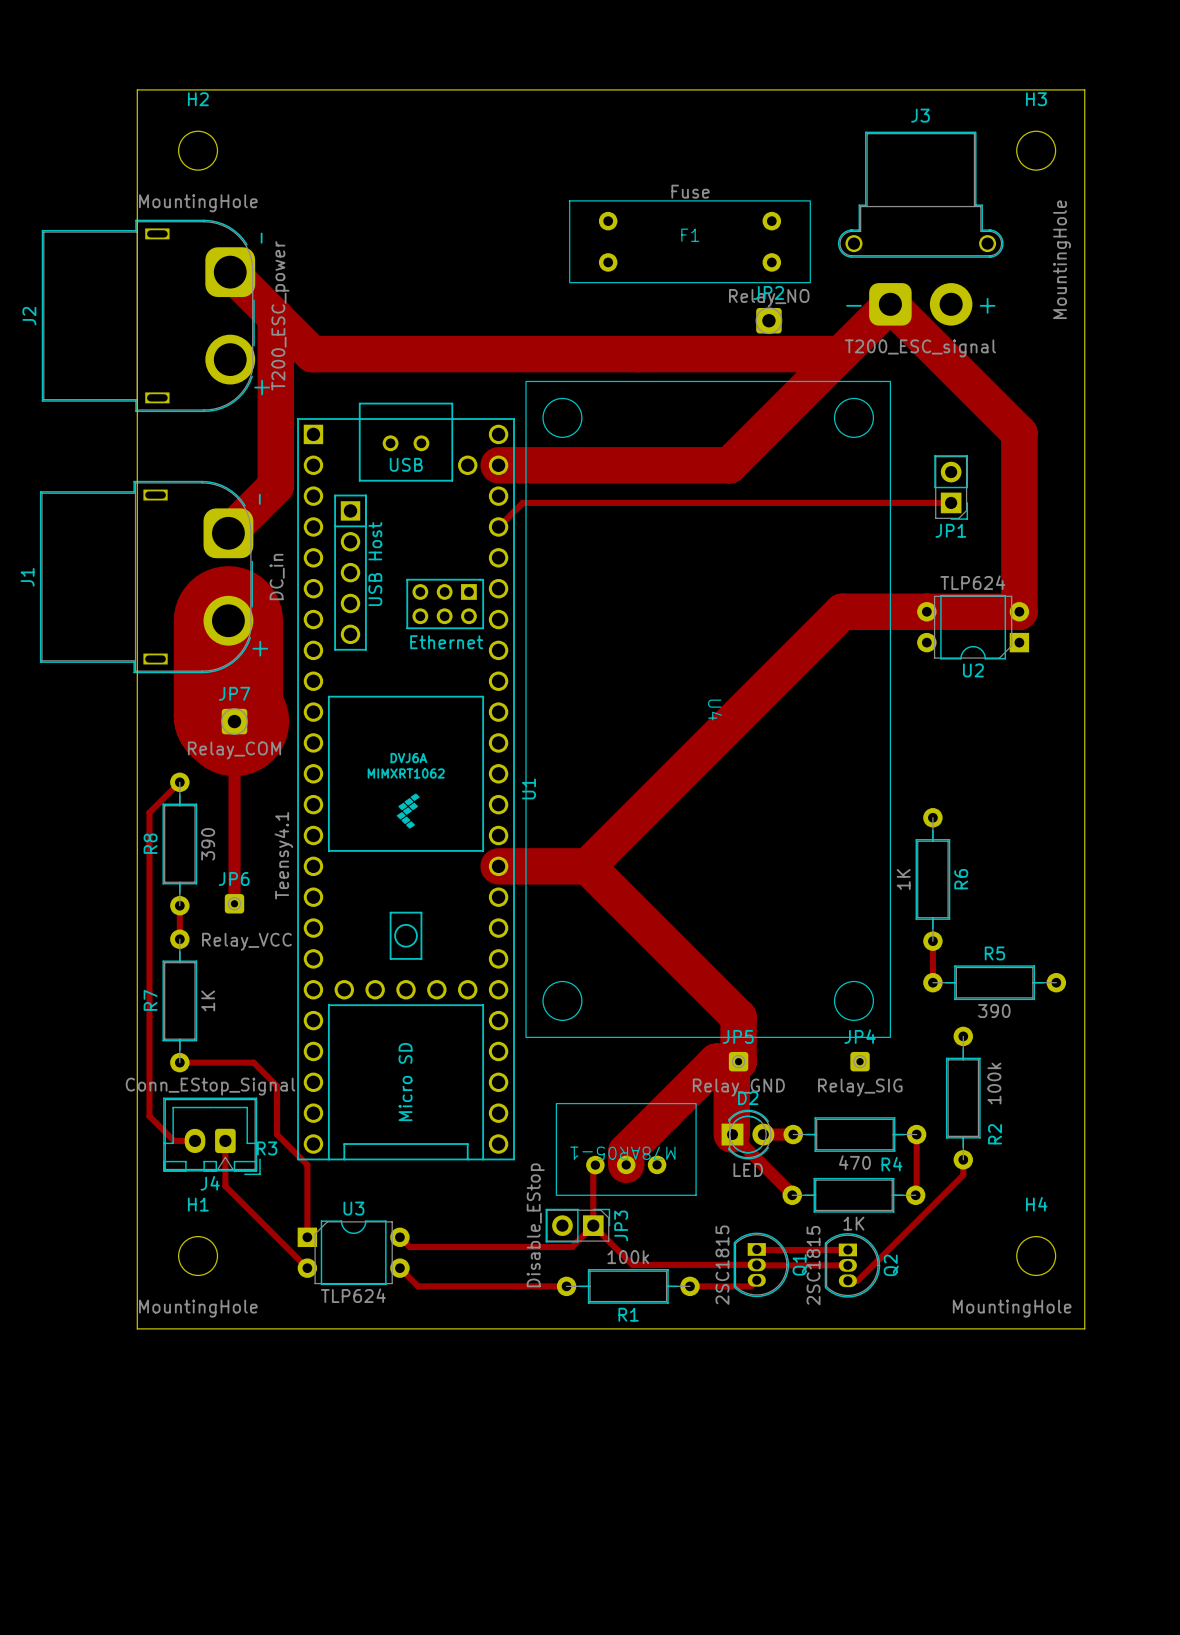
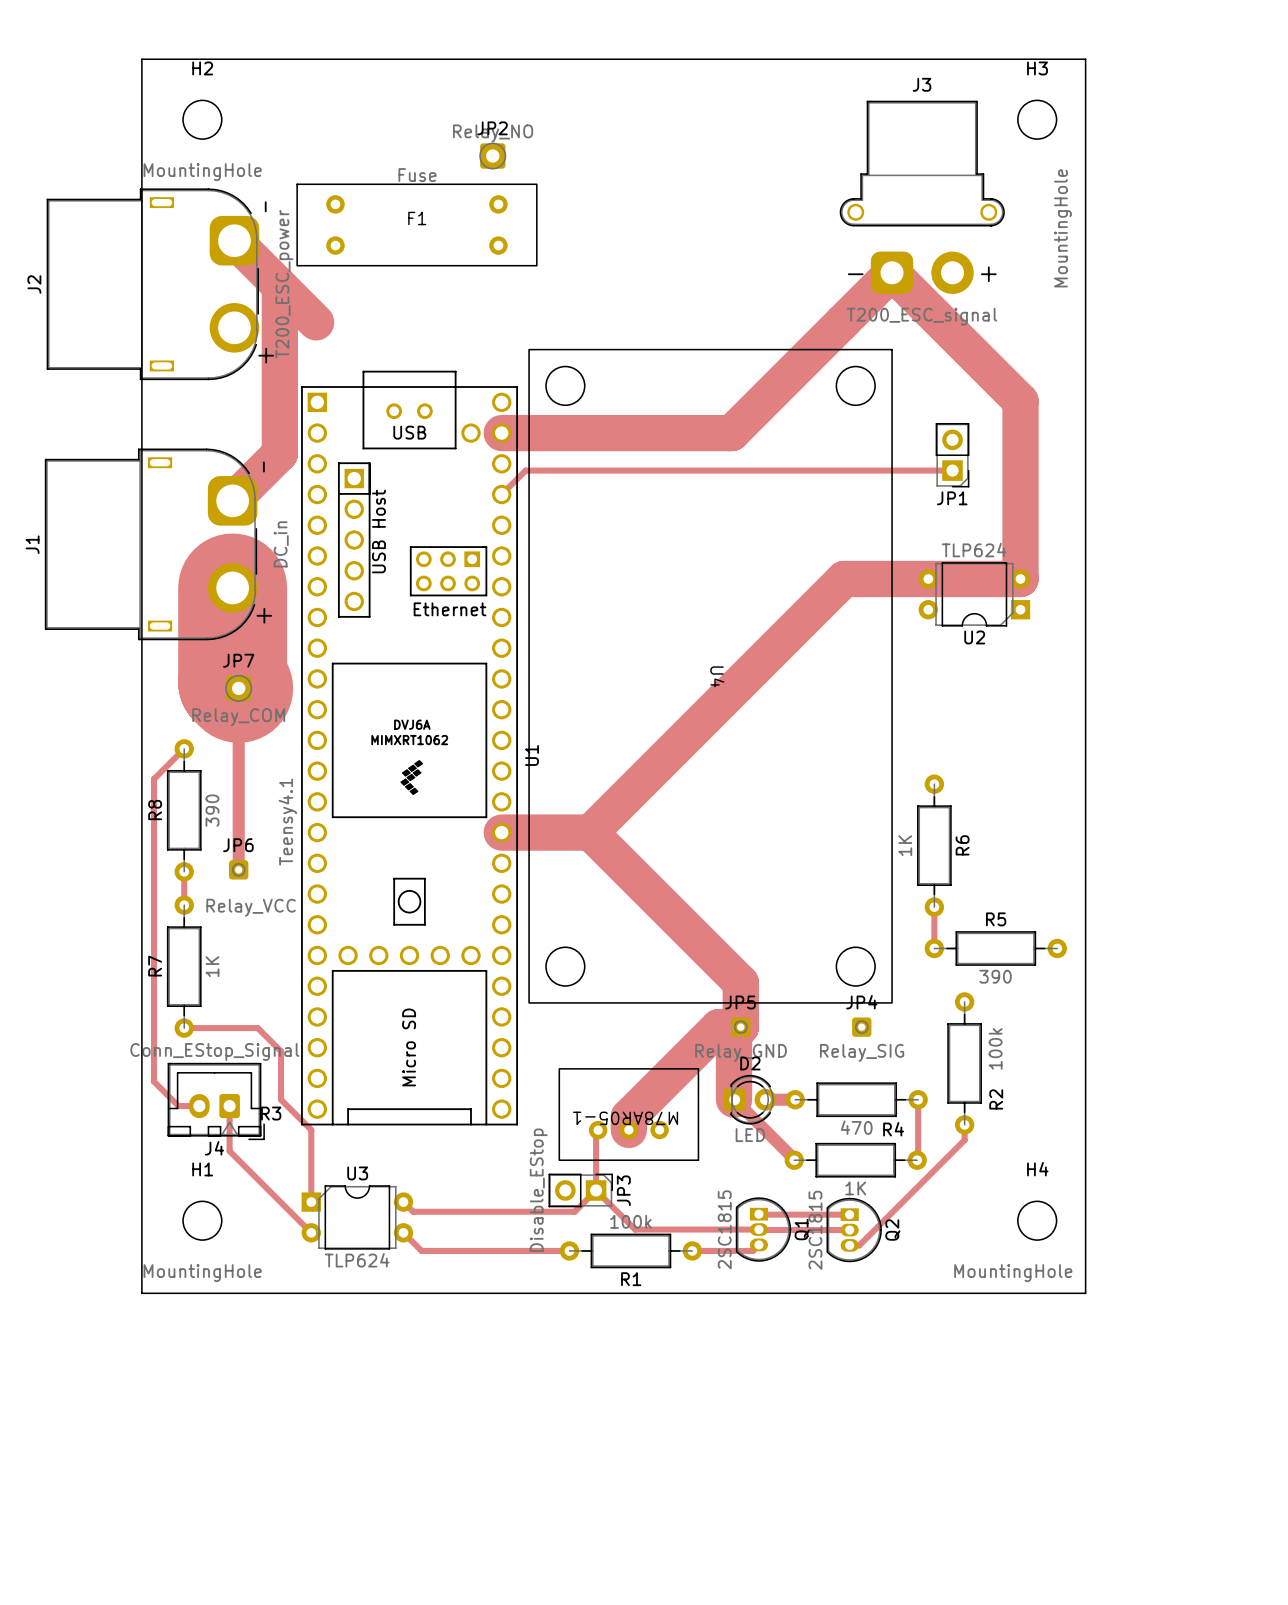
F1 position: (689, 241) -> (416, 224)
JP2 position: (768, 320) -> (492, 156)
track: (312, 354) (840, 354) -> none

